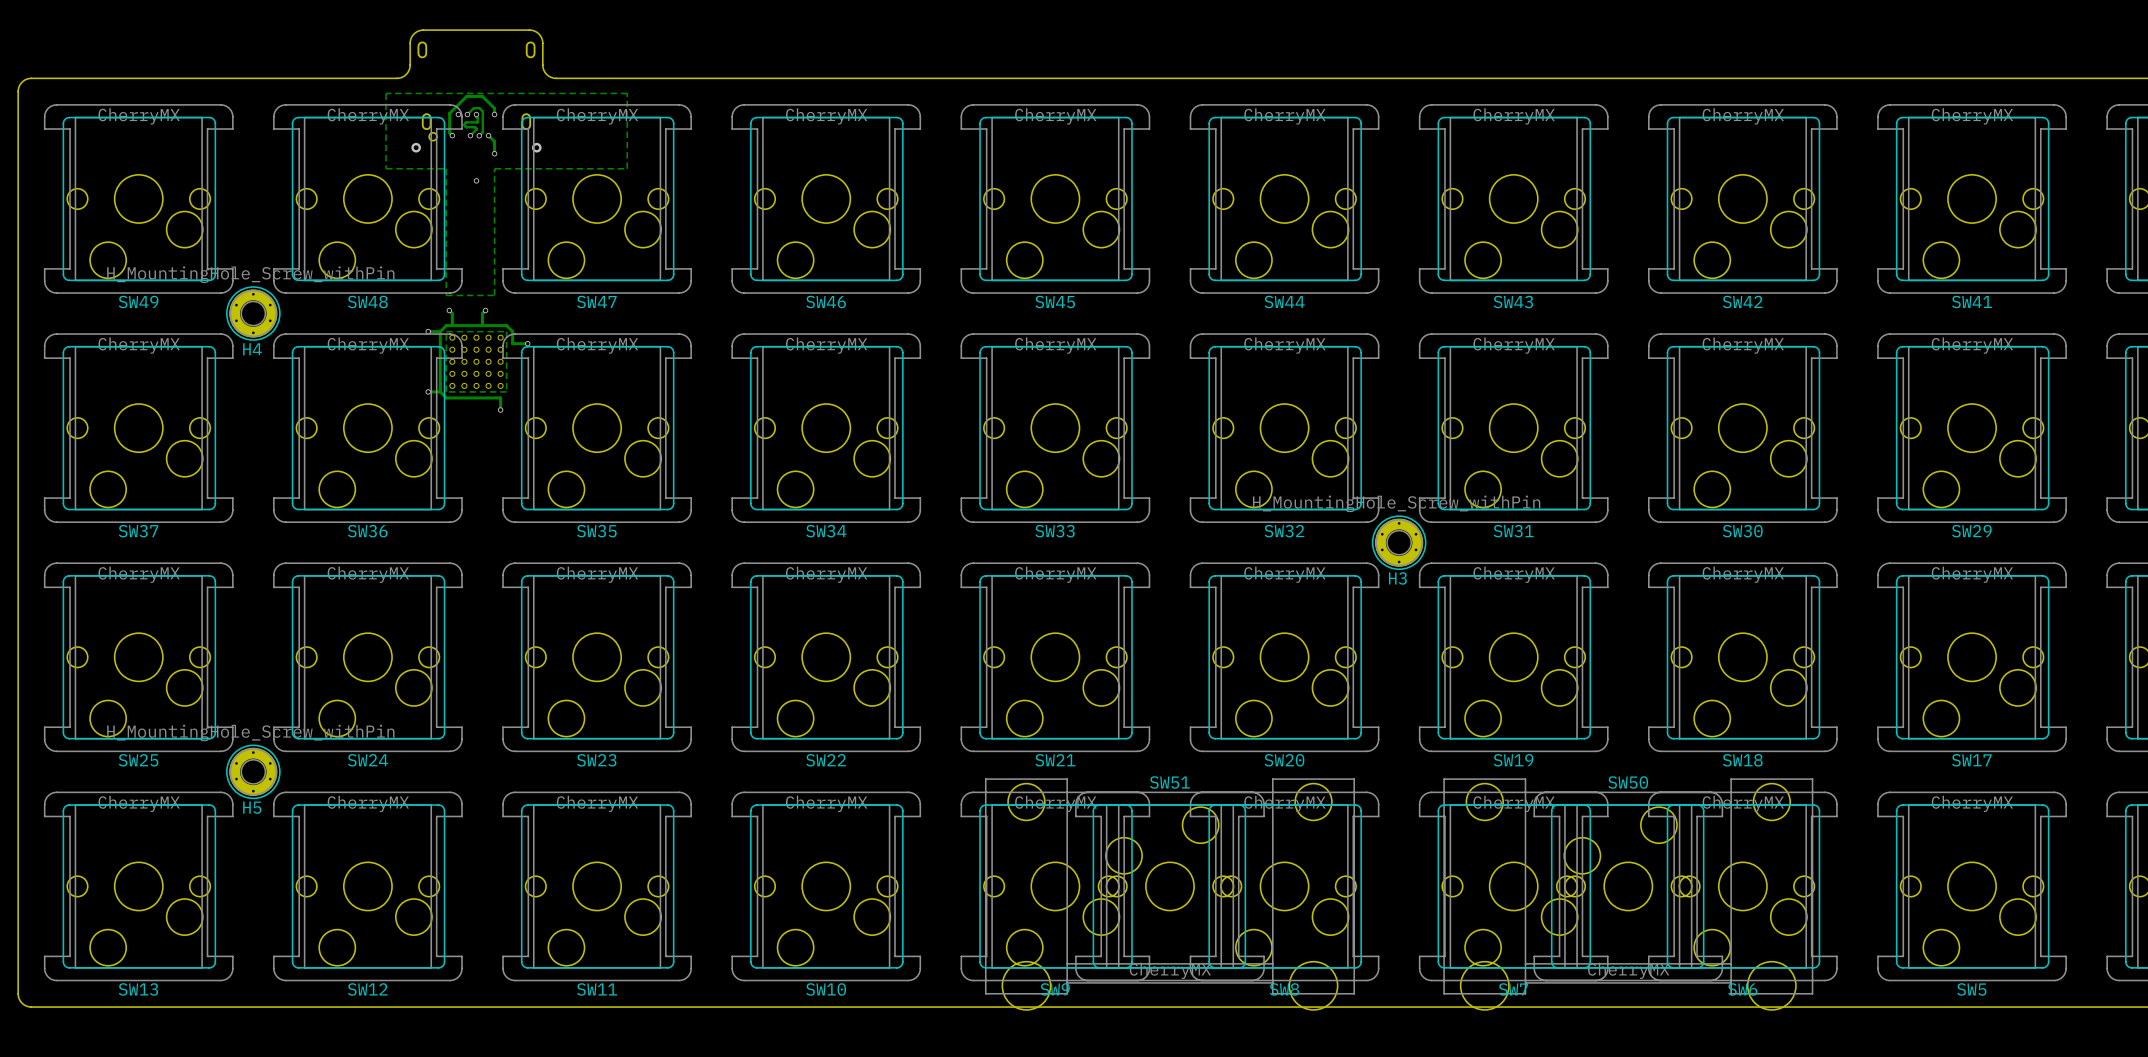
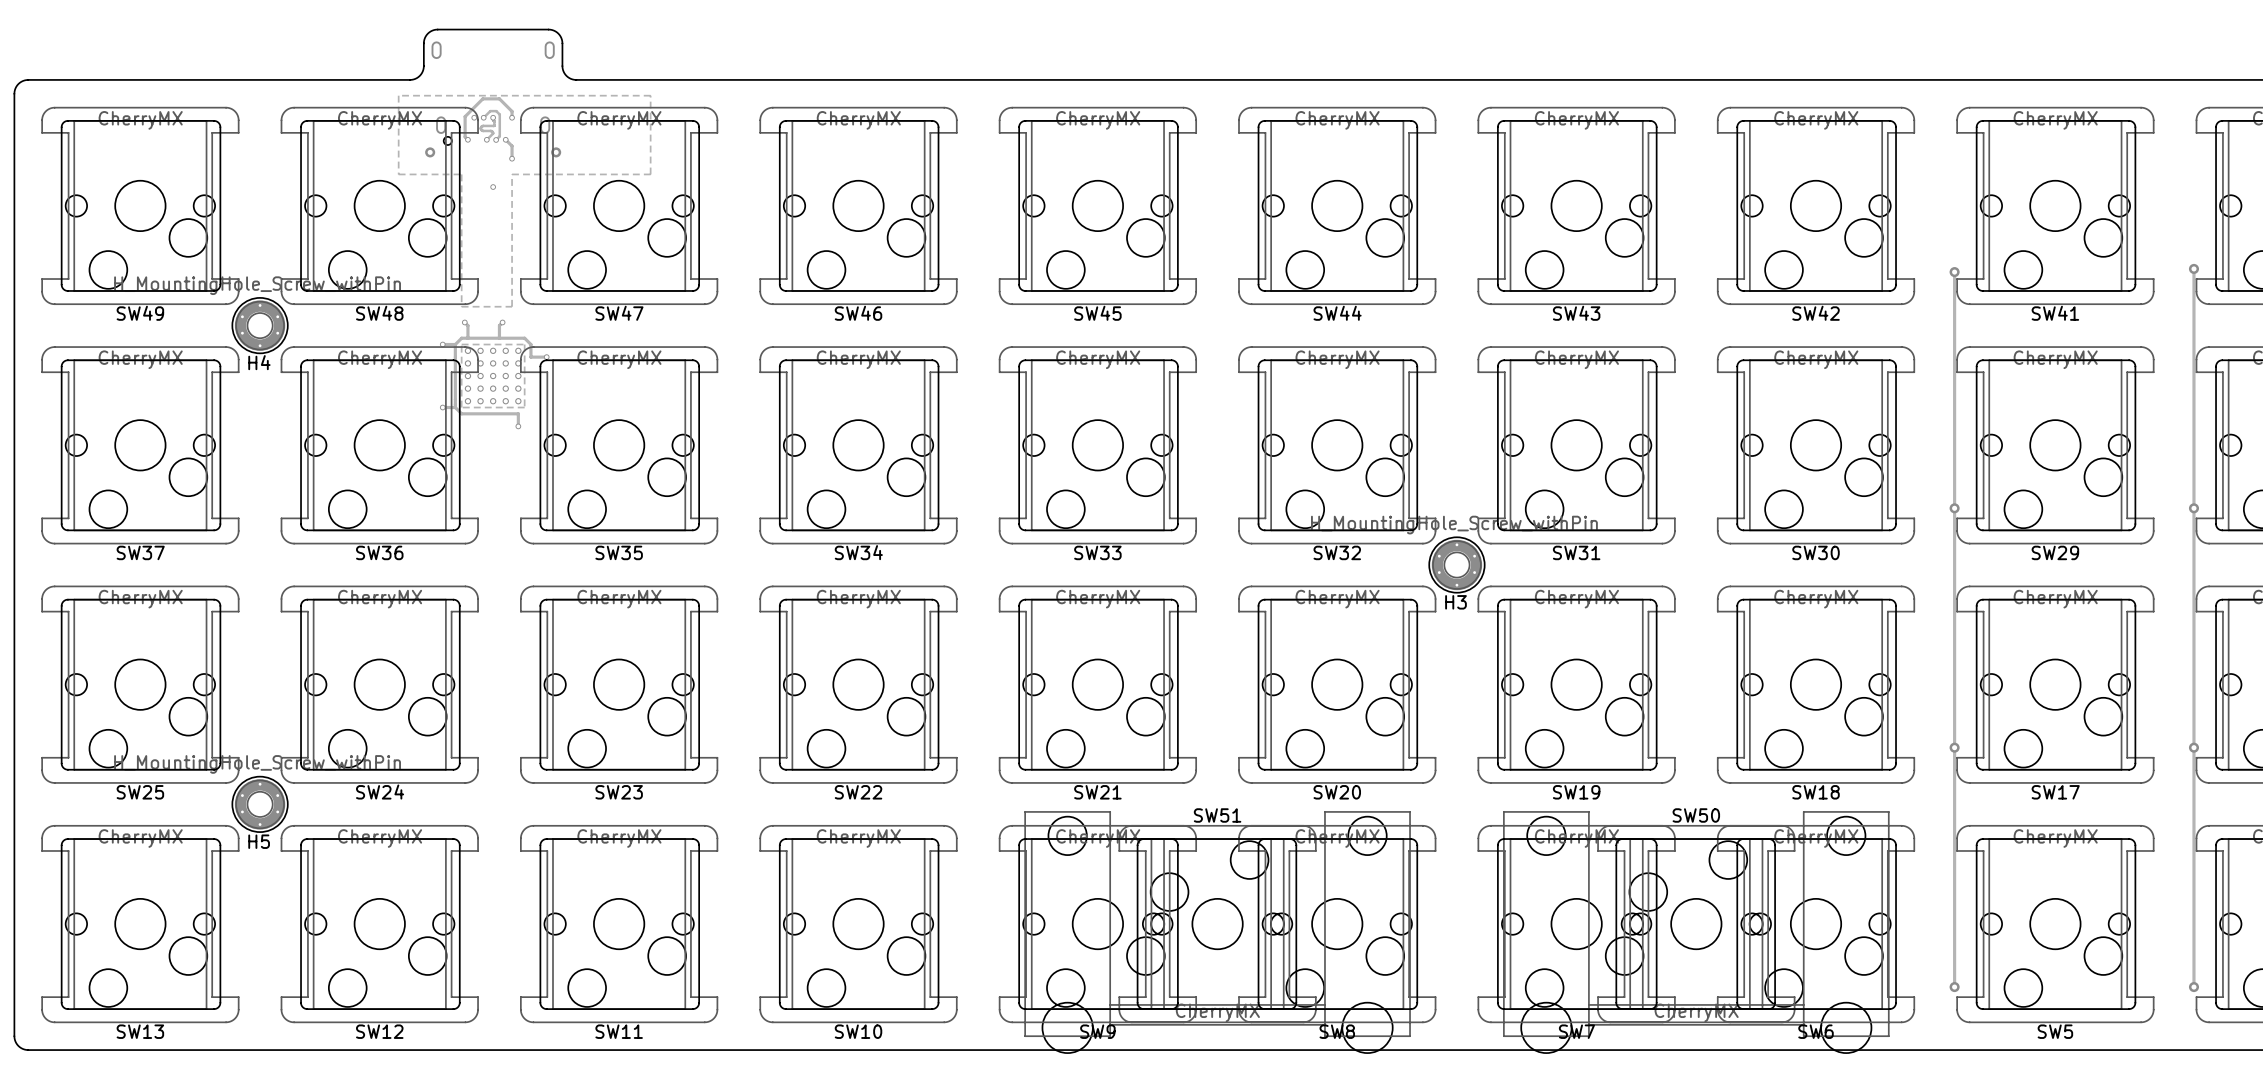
track: none -> (2193, 268) (2193, 987)
via: none -> (2193, 268)
track: none -> (1954, 272) (1954, 987)
via: none -> (1954, 272)
via: none -> (1954, 508)
via: none -> (2193, 508)
via: none -> (1954, 747)
via: none -> (2193, 747)
via: none -> (1954, 987)
via: none -> (2193, 987)

